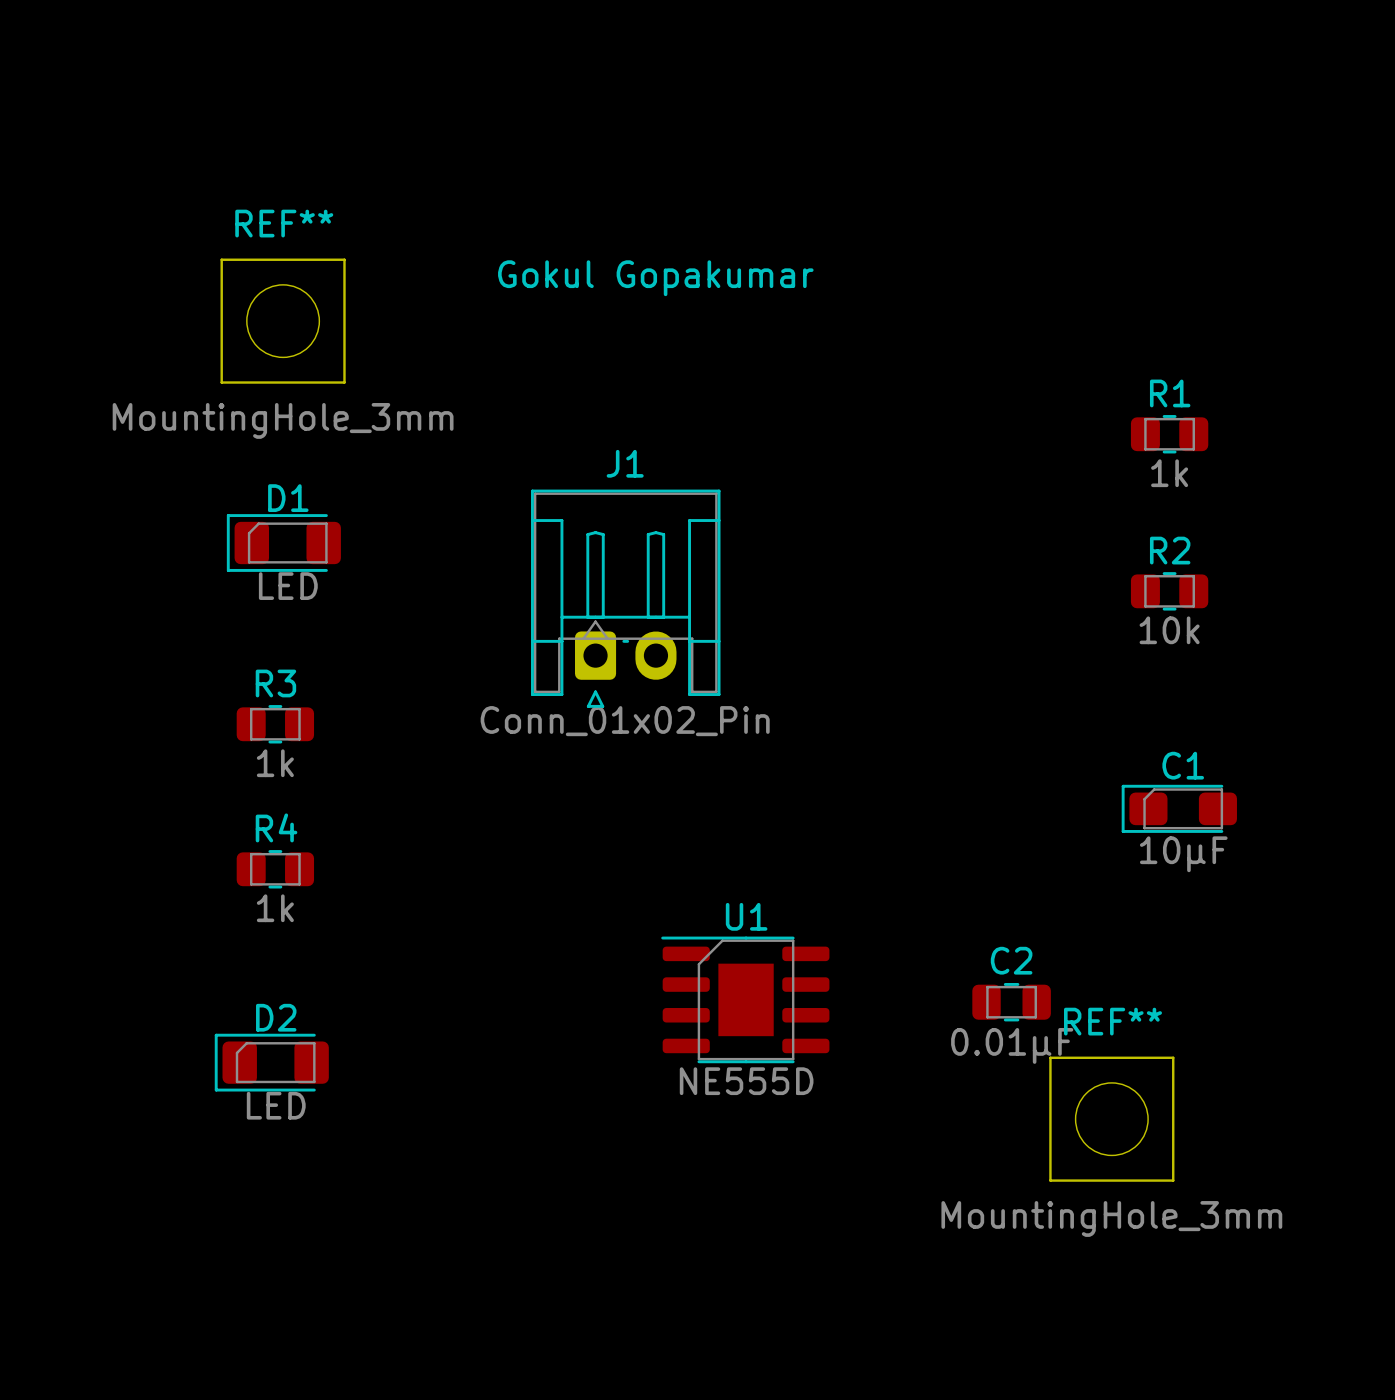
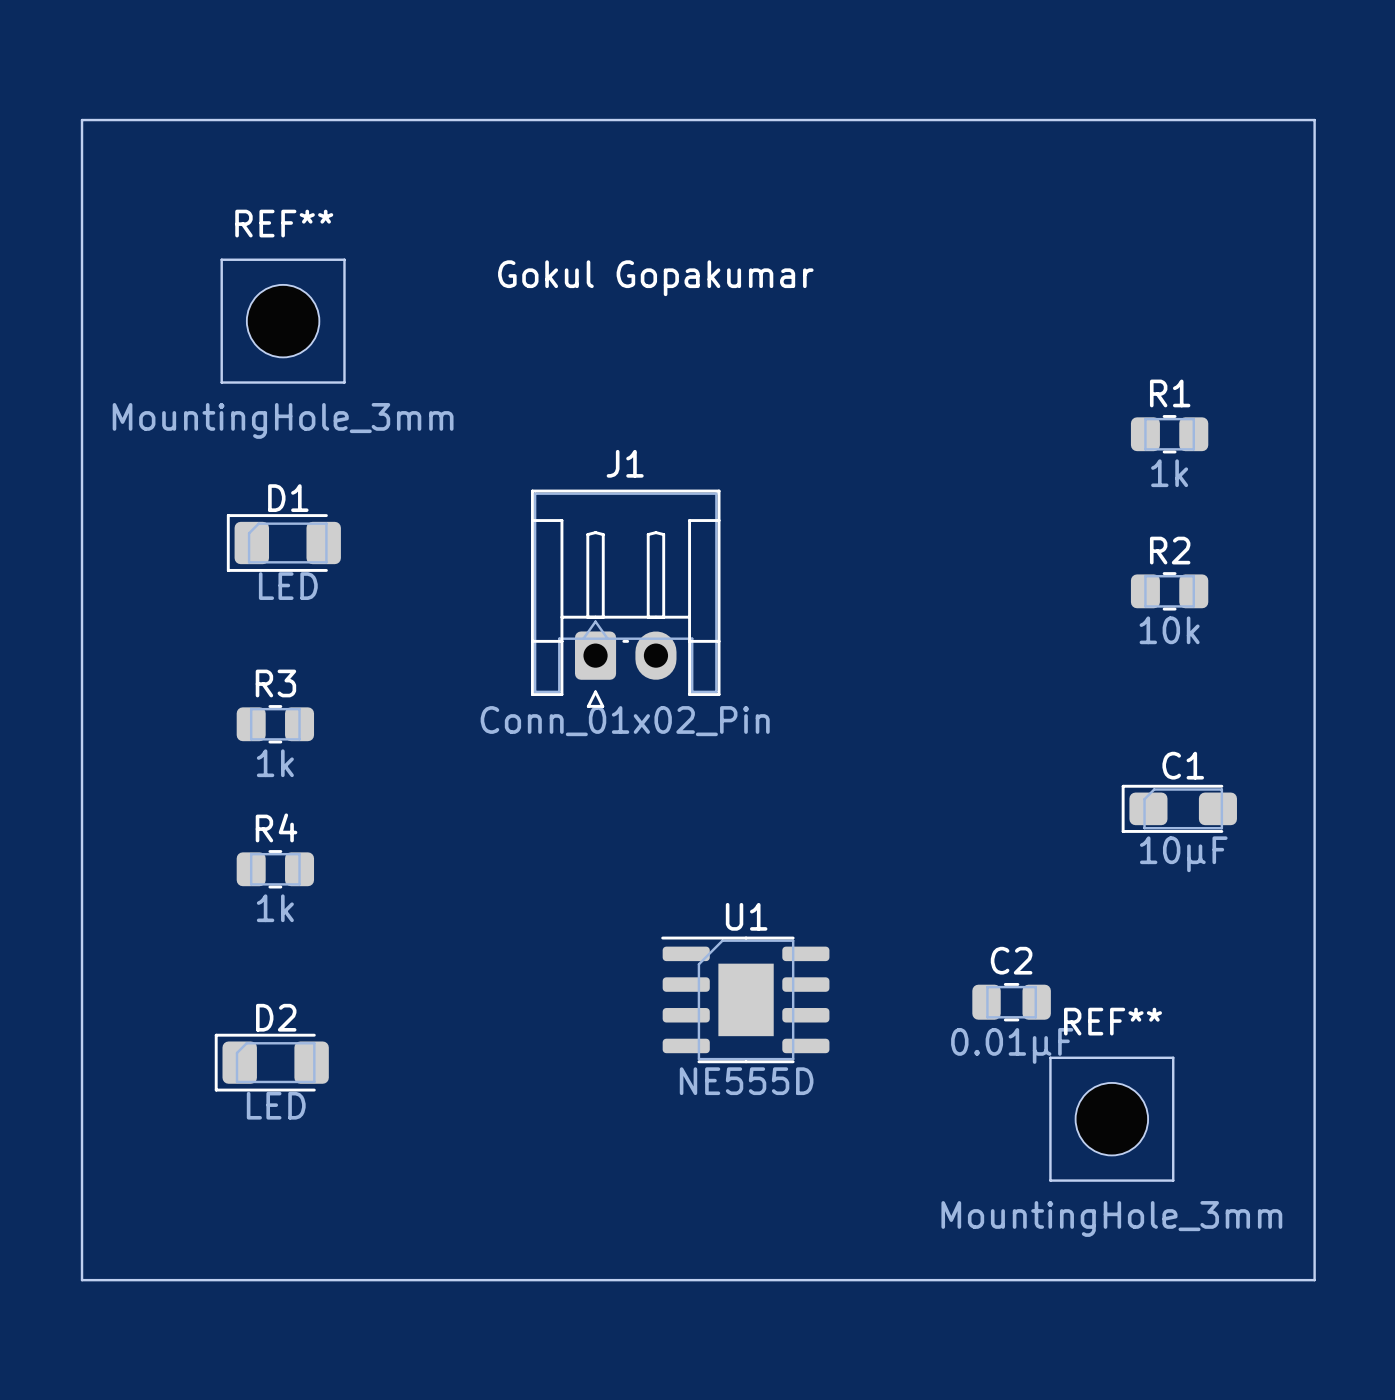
board edge: none -> (82, 120) (1314, 120) (1314, 1280) (82, 1280) (82, 120)

